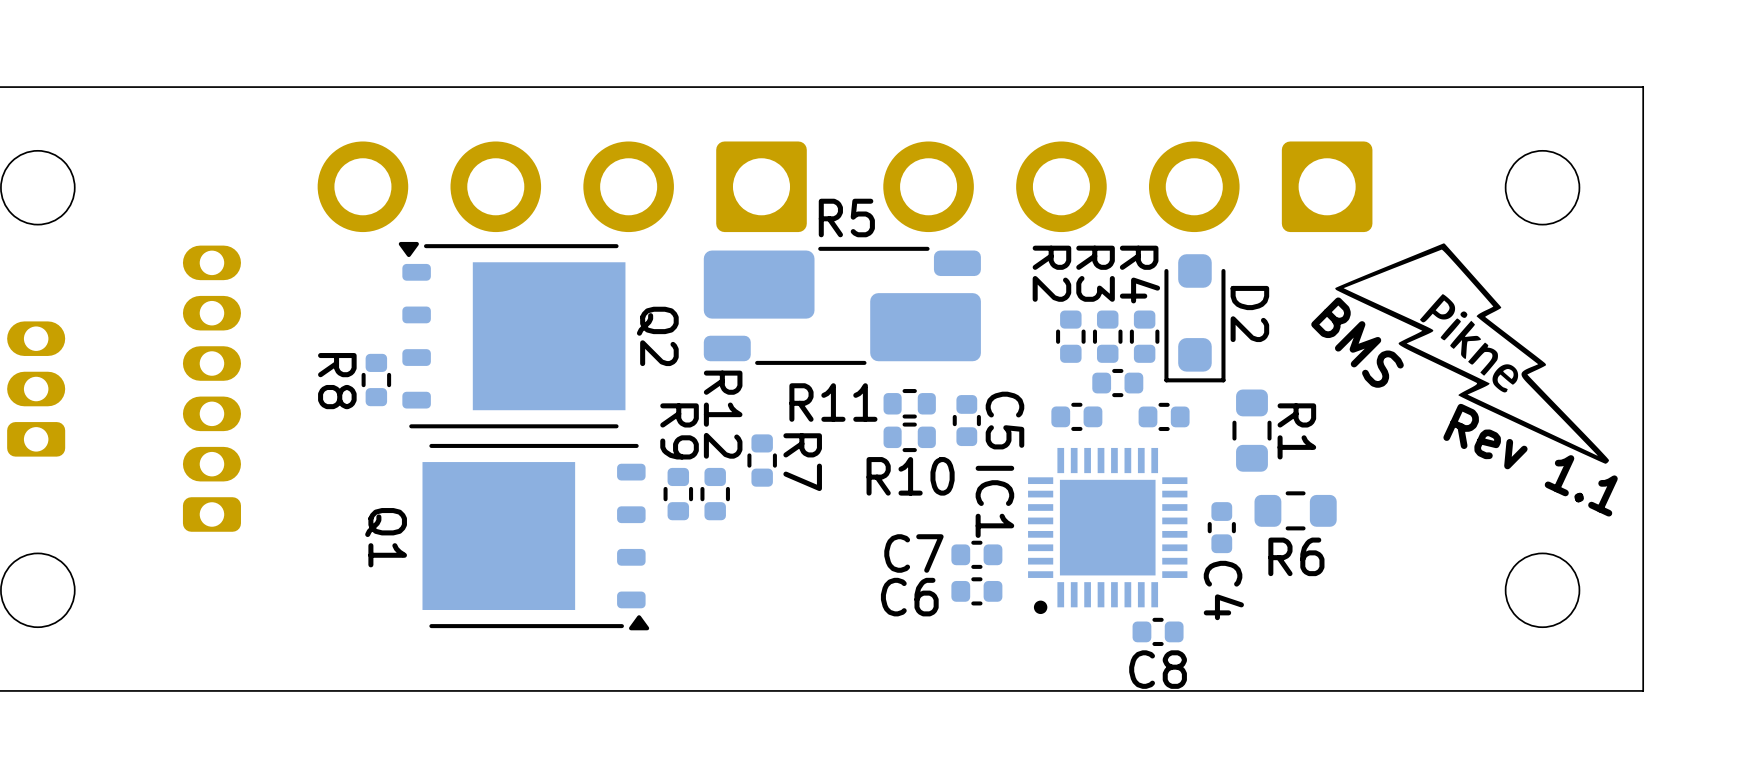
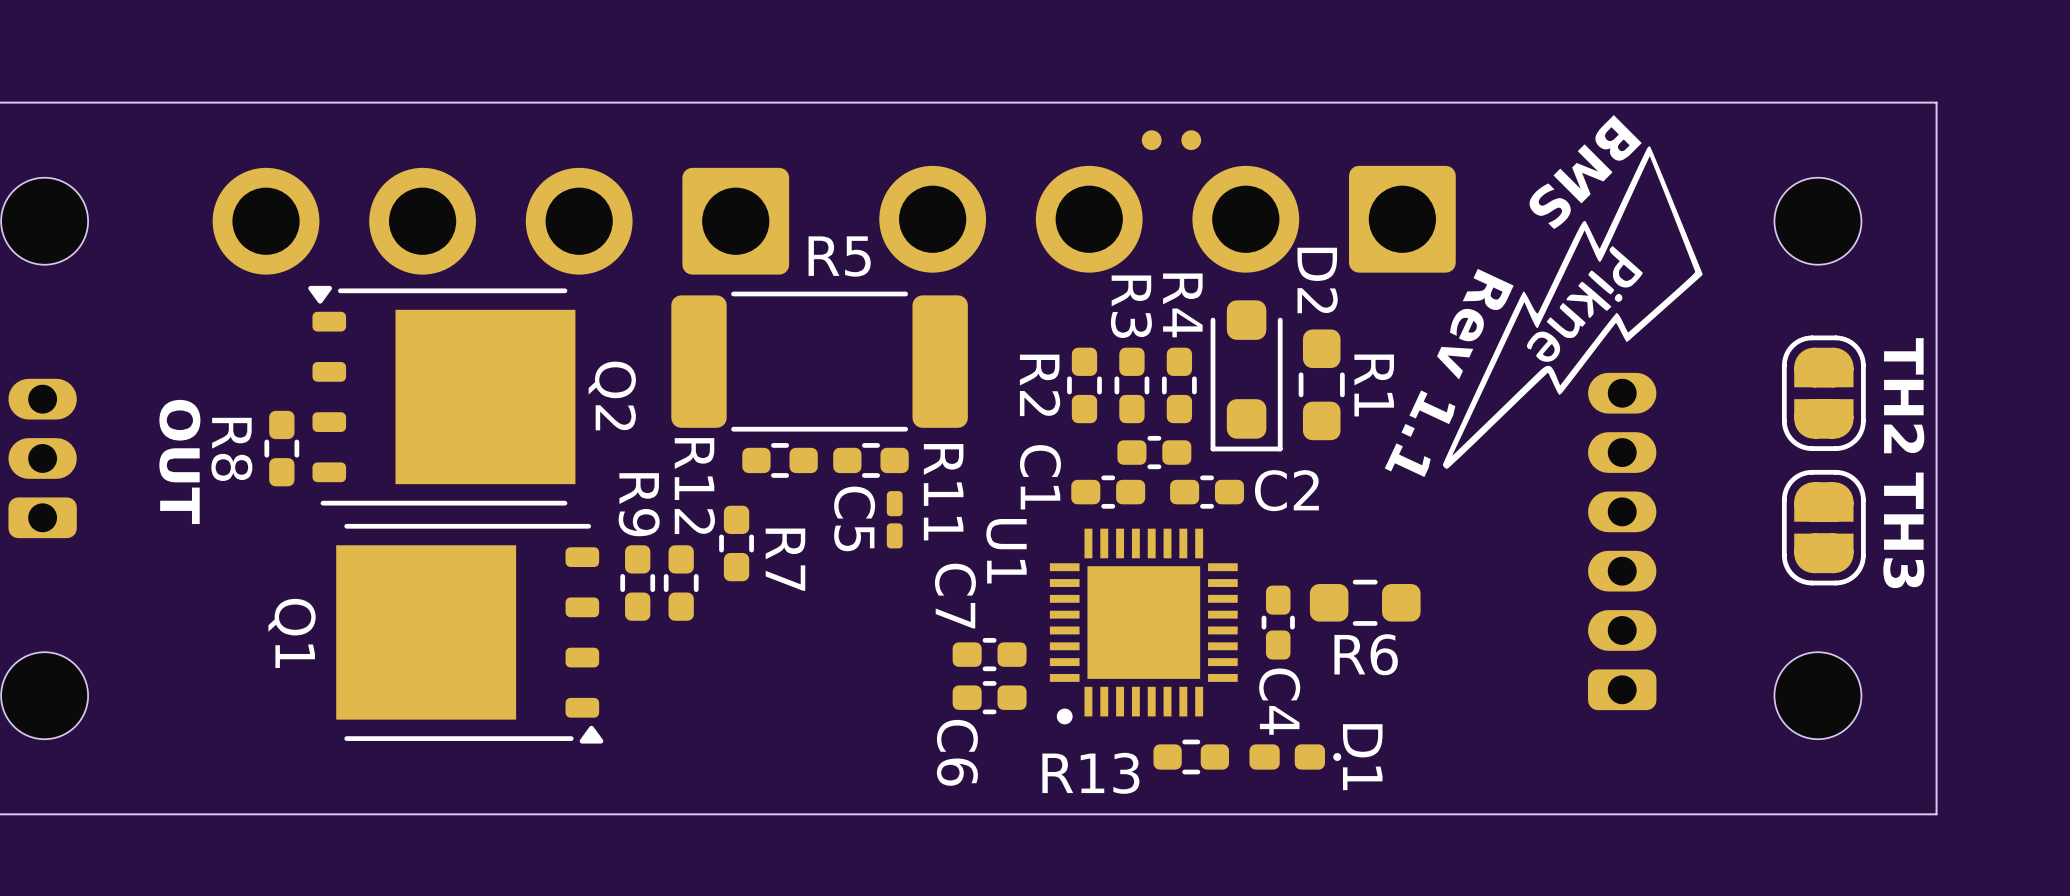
part: none -> (1171, 140)
drawing: none -> [1442, 146, 1703, 469]
part position: (562, 186) -> (500, 221)
part position: (1127, 186) -> (1167, 219)
drawing: [1335, 243, 1609, 464] -> none
R5 footprint: [703, 246, 981, 365] -> [671, 291, 968, 432]
R2 footprint: [1056, 310, 1086, 363] -> [1067, 347, 1102, 424]
R3 footprint: [1092, 310, 1123, 363] -> [1114, 347, 1150, 424]
R4 footprint: [1129, 310, 1160, 363] -> [1161, 347, 1197, 424]
D2 name position: D2 (1249, 313) -> D2 (1317, 280)
drawing position: (1463, 314) -> (1618, 297)
D2 position: (1194, 318) -> (1246, 375)
part: none -> (1823, 393)
Q2 position: (512, 335) -> (441, 395)
text: none -> TH2 (1904, 395)
text rotation: 0° (1357, 342) -> 90° clockwise (1585, 172)
text position: BMS (1357, 342) -> BMS (1585, 172)
R8 footprint: [361, 353, 392, 407] -> [264, 410, 300, 487]
part: none -> (1154, 452)
part: (1117, 383) -> none
part: (211, 388) -> none
R11 footprint: [883, 389, 936, 419] -> [833, 443, 909, 478]
R1 footprint: [1232, 389, 1272, 472] -> [1298, 329, 1345, 441]
text: none -> OUT (179, 461)
part: none -> (780, 460)
C5 footprint: [952, 395, 981, 447] -> [886, 491, 903, 549]
R11 name position: R11 (833, 402) -> R11 (943, 492)
part: (1076, 416) -> none
part: (1164, 416) -> none
C1: none -> (1108, 492)
C2: none -> (1207, 492)
C5 name position: C5 (1004, 420) -> C5 (854, 518)
R7 footprint: [747, 434, 777, 487] -> [719, 505, 754, 582]
R10: (909, 437) -> none
part: none -> (1823, 527)
text: none -> TH3 (1903, 530)
part: none -> (1622, 541)
text rotation: 0° (1530, 460) -> 90° clockwise (1449, 372)
text position: Rev 1.1 (1530, 460) -> Rev 1.1 (1449, 372)
R9 footprint: [663, 467, 694, 521] -> [620, 545, 656, 621]
R12 footprint: [700, 467, 730, 521] -> [663, 545, 699, 621]
R6 footprint: [1254, 491, 1337, 531] -> [1309, 579, 1421, 626]
C4 footprint: [1207, 502, 1236, 554] -> [1261, 585, 1295, 660]
IC1: (1107, 530) -> none
U1: none -> (1143, 626)
Q1 position: (535, 537) -> (469, 633)
C7 footprint: [951, 540, 1003, 569] -> [952, 637, 1027, 672]
C6 footprint: [951, 577, 1003, 606] -> [952, 681, 1027, 715]
C8: (1158, 631) -> none
R13: none -> (1191, 756)
D1: none -> (1295, 756)

